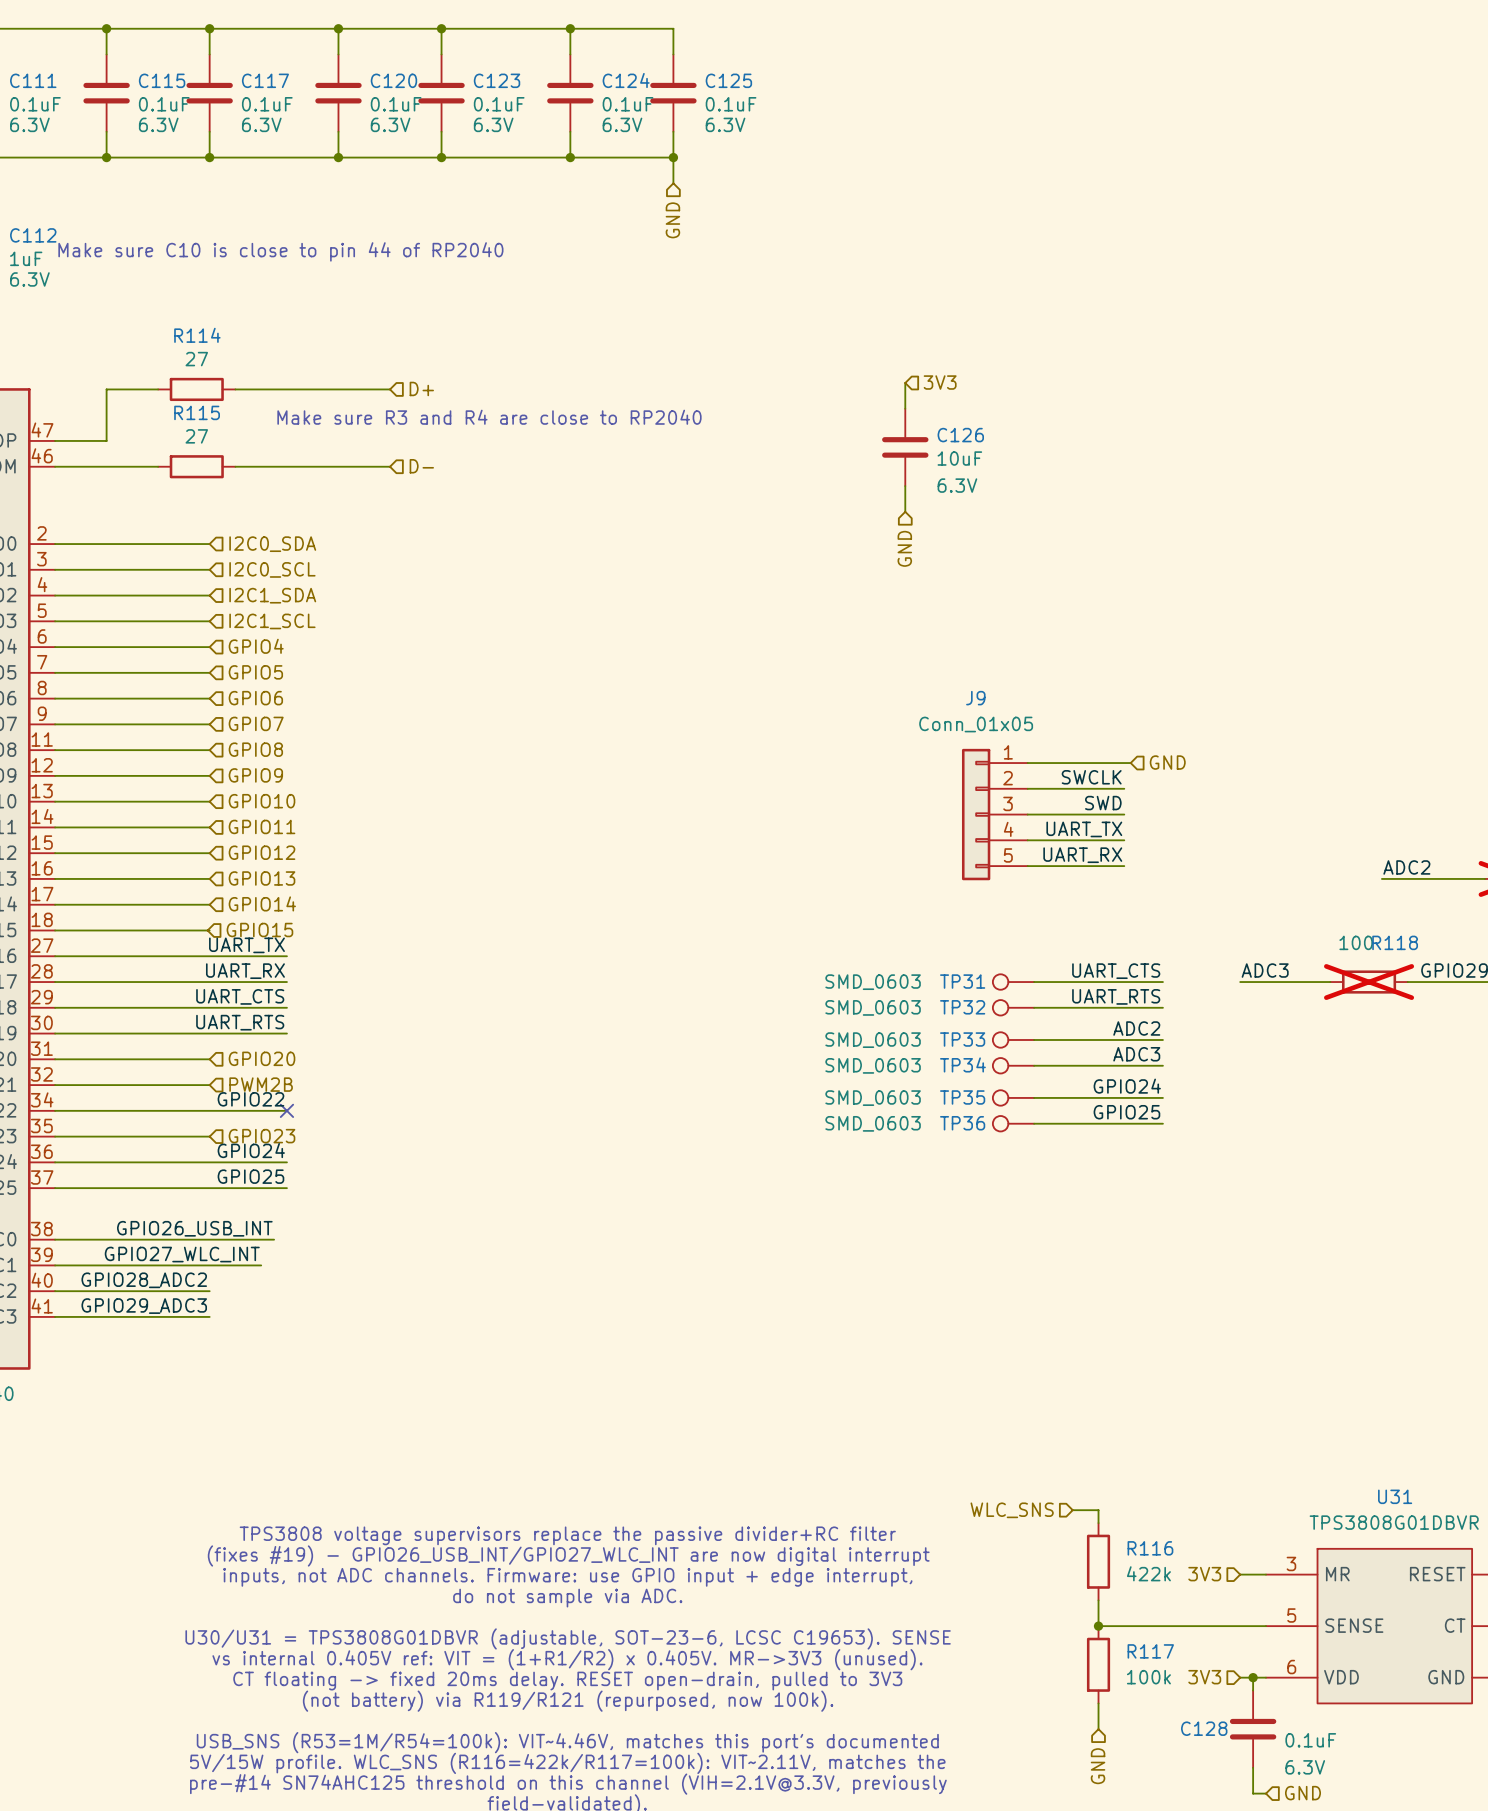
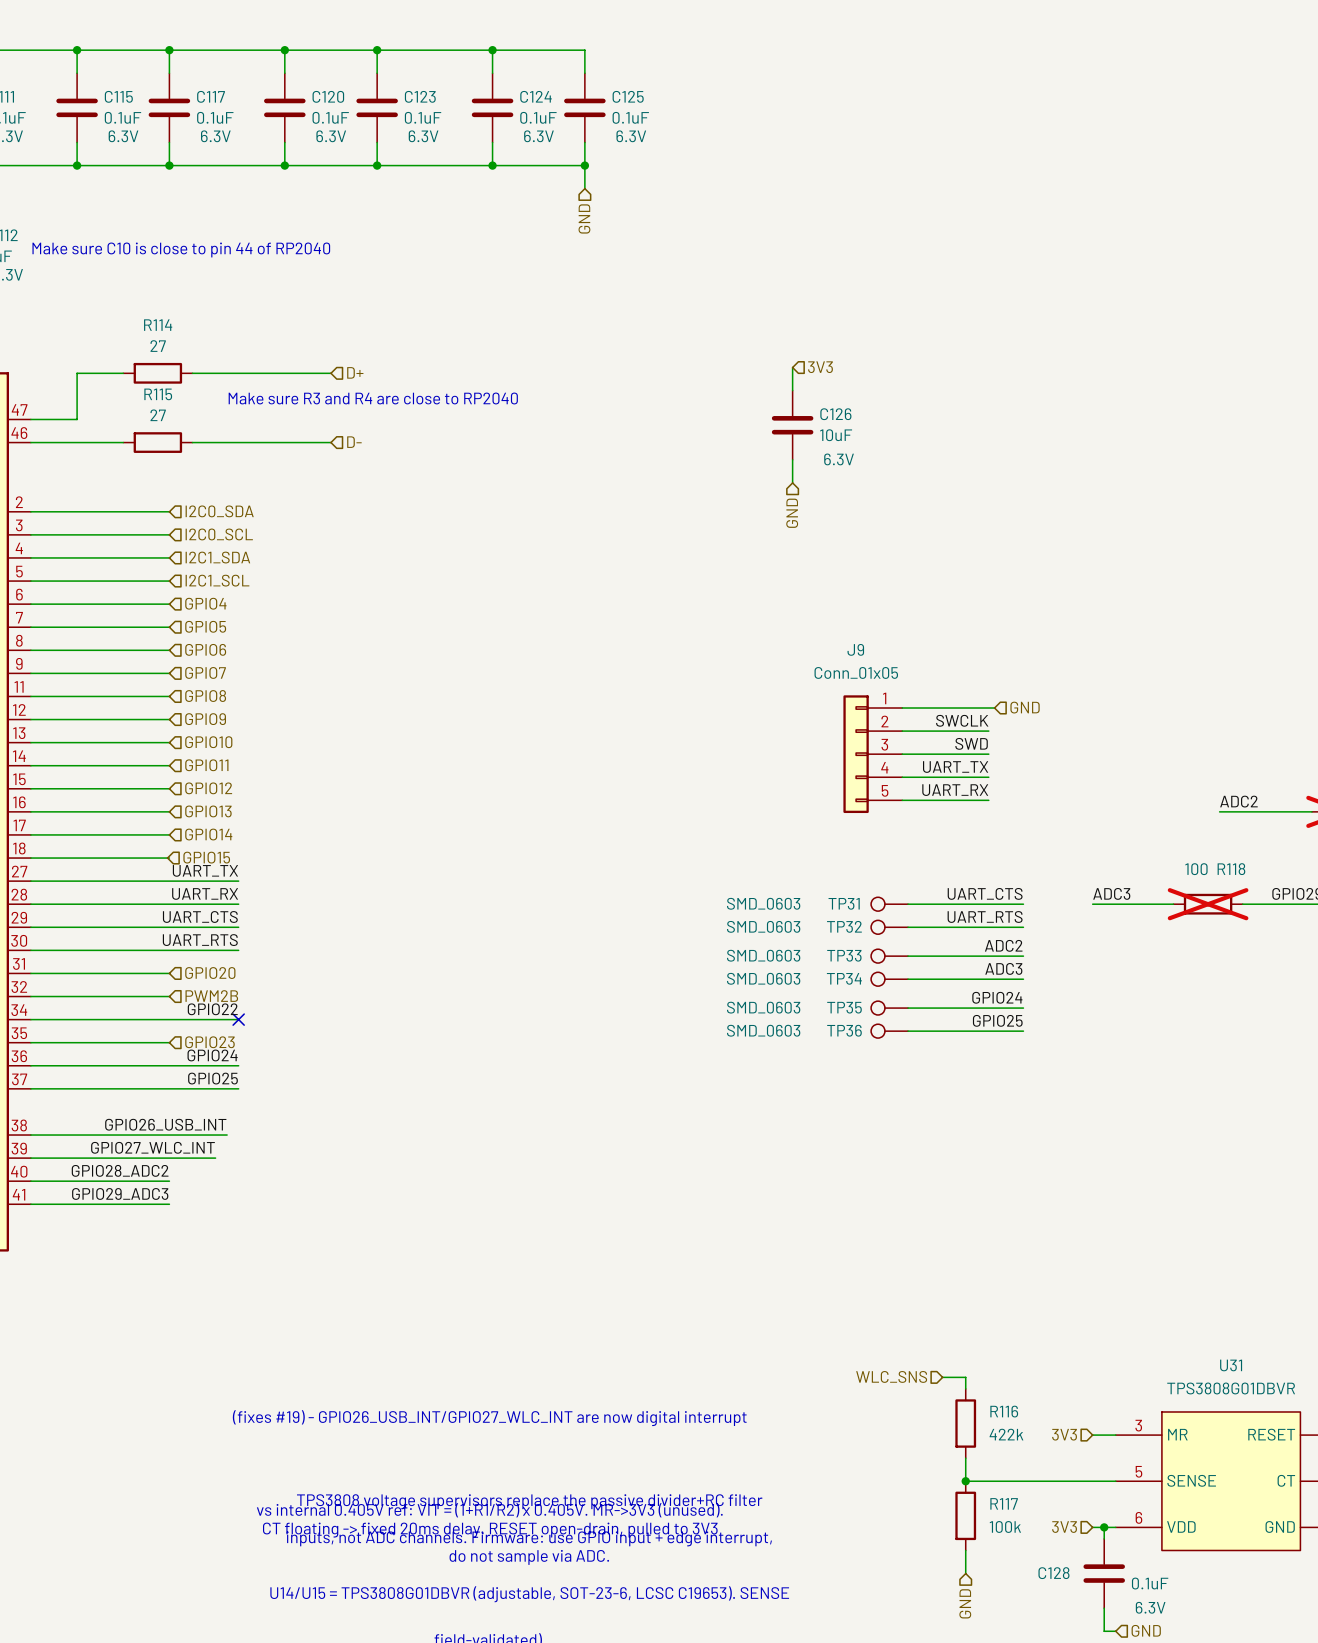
text position: TPS3808 voltage supervisors replace the passive divider+RC filter (567, 1535) -> TPS3808 voltage supervisors replace the passive divider+RC filter (529, 1501)
text position: inputs, not ADC channels. Firmware: use GPIO input + edge interrupt, (567, 1577) -> inputs, not ADC channels. Firmware: use GPIO input + edge interrupt, (529, 1538)
text position: do not sample via ADC. (567, 1598) -> do not sample via ADC. (529, 1557)
text: U30/U31 = TPS3808G01DBVR (adjustable, SOT-23-6, LCSC C19653). SENSE (568, 1638) -> none
text: (not battery) via R119/R121 (repurposed, now 100k). (568, 1701) -> none
text: USB_SNS (R53=1M/R54=100k): VIT~4.46V, matches this port's documented (567, 1742) -> none
text: none -> U14/U15 = TPS3808G01DBVR (adjustable, SOT-23-6, LCSC C19653). SENSE (529, 1594)
text: 5V/15W profile. WLC_SNS (R116=422k/R117=100k): VIT~2.11V, matches the (567, 1763) -> none
text: pre-#14 SN74AHC125 threshold on this channel (VIH=2.1V@3.3V, previously (568, 1784) -> none

